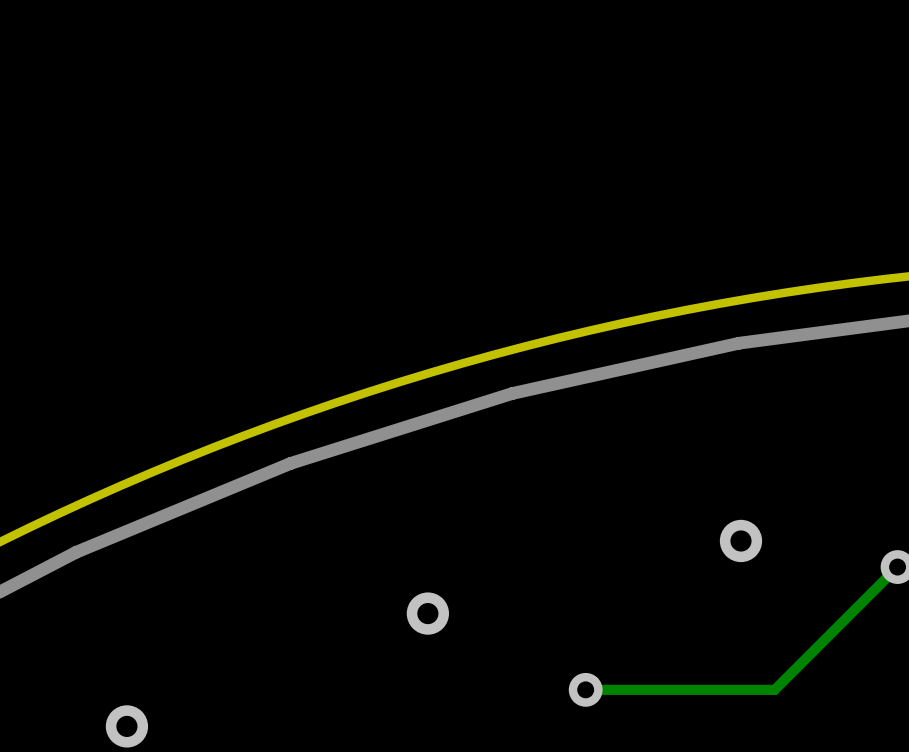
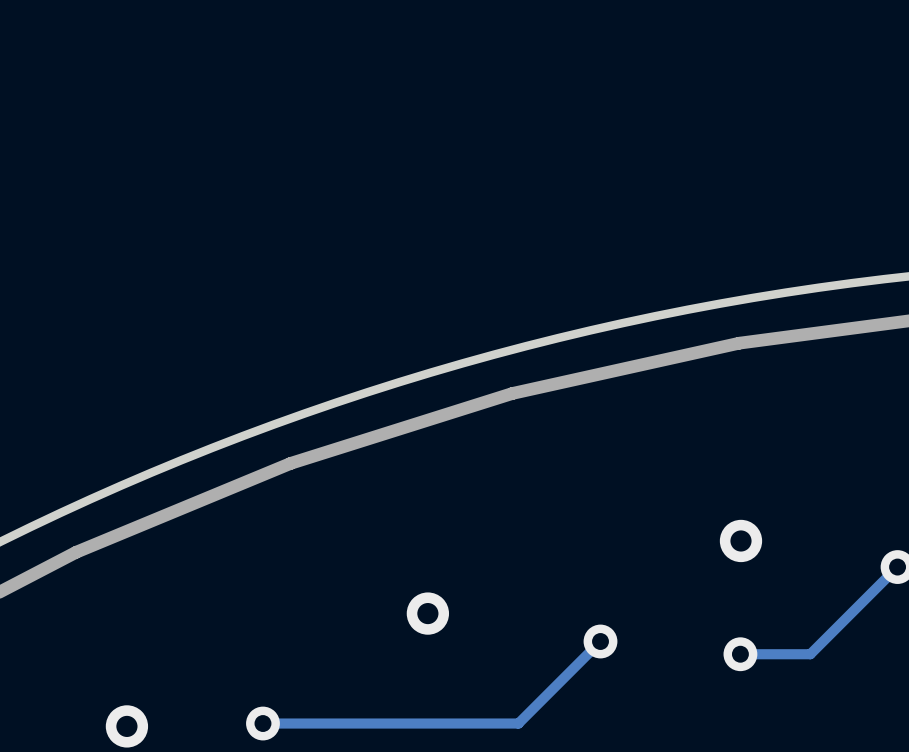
track: (897, 567) (774, 689) (585, 689) -> (897, 567) (810, 654) (740, 654)
track: none -> (600, 641) (518, 723) (262, 723)
via: none -> (740, 654)
via position: (585, 689) -> (600, 641)
via: none -> (262, 723)

